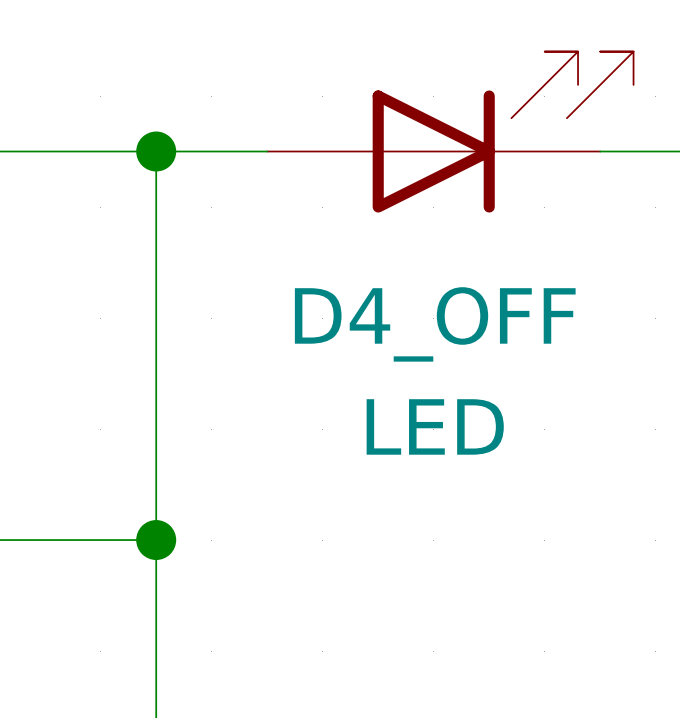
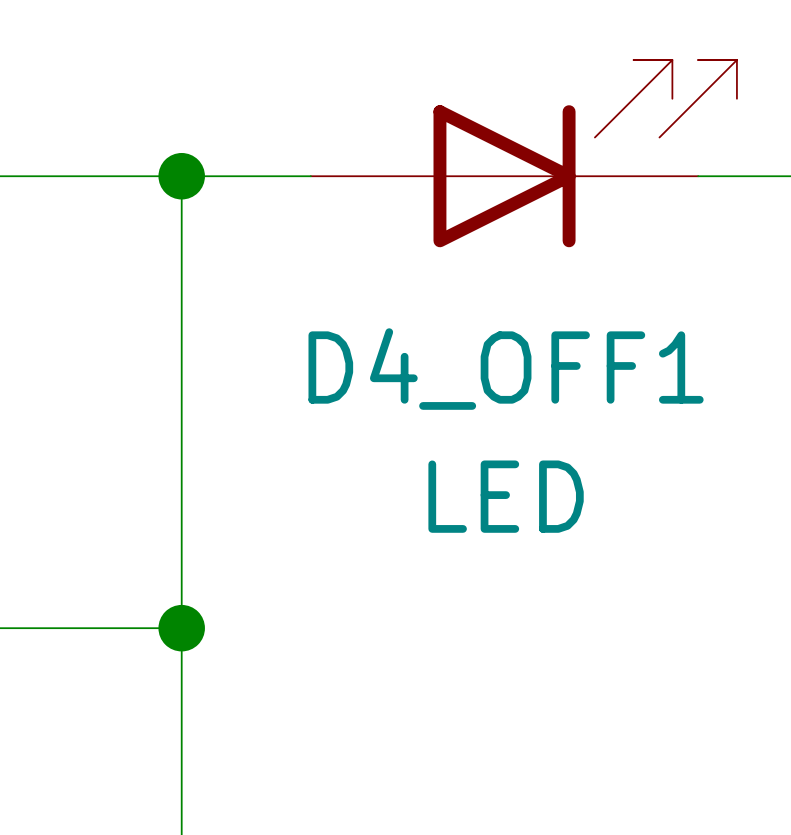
D4_OFF name: D4_OFF (435, 324) -> D4_OFF1 (506, 369)

